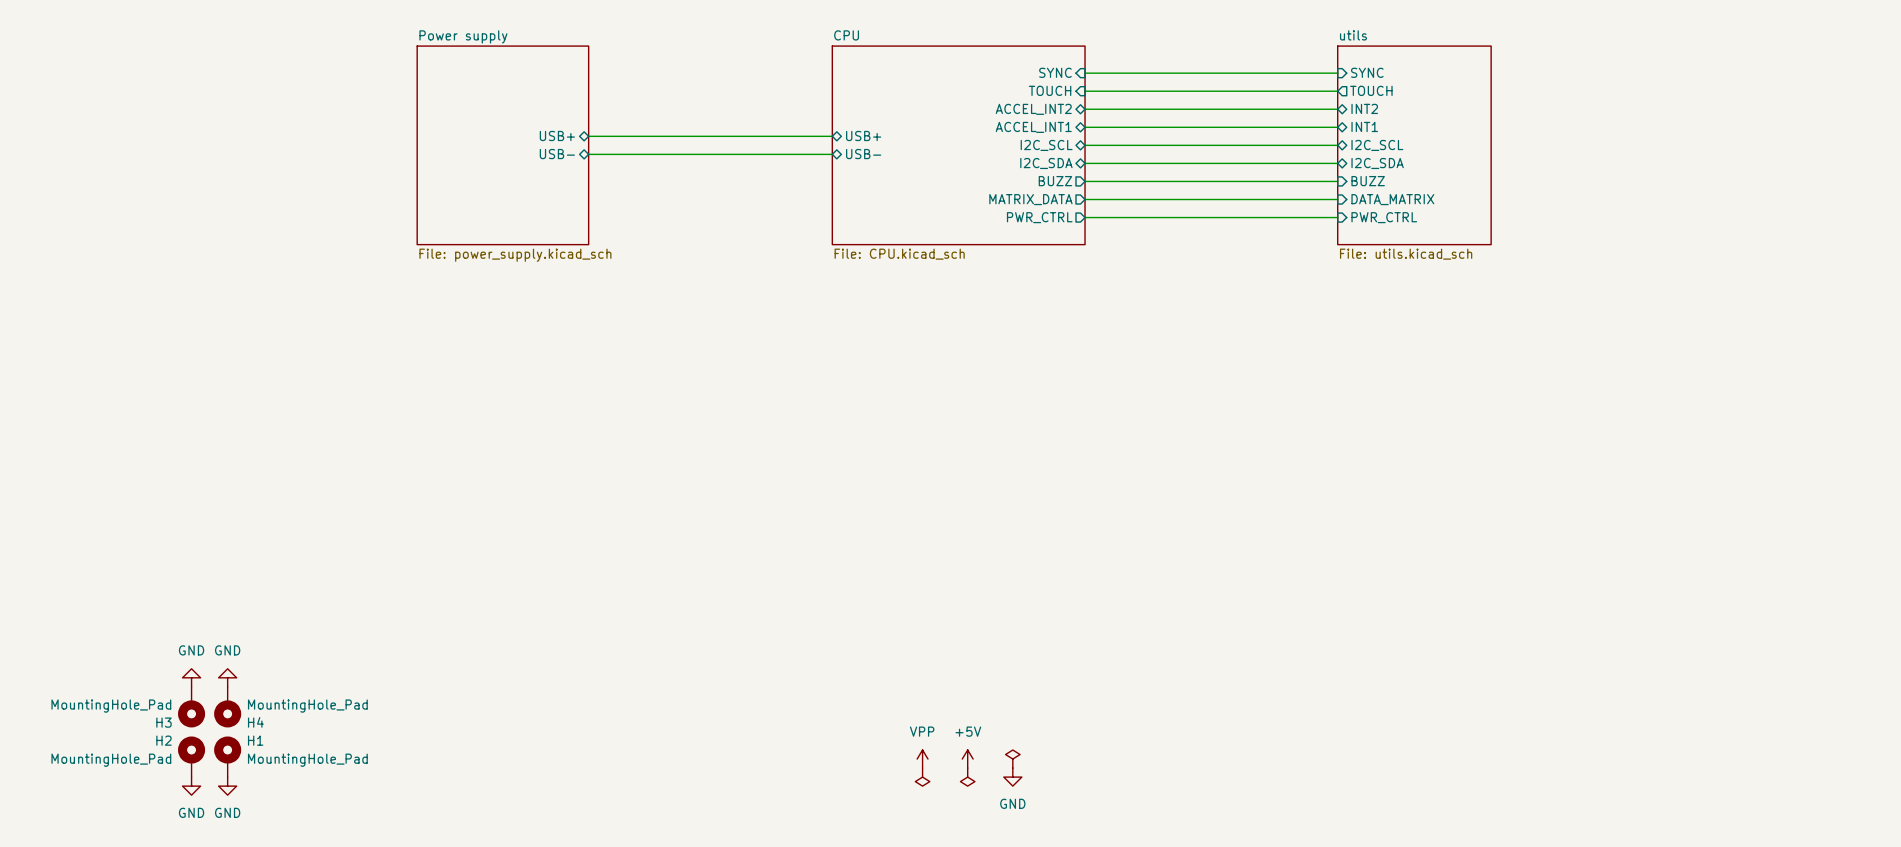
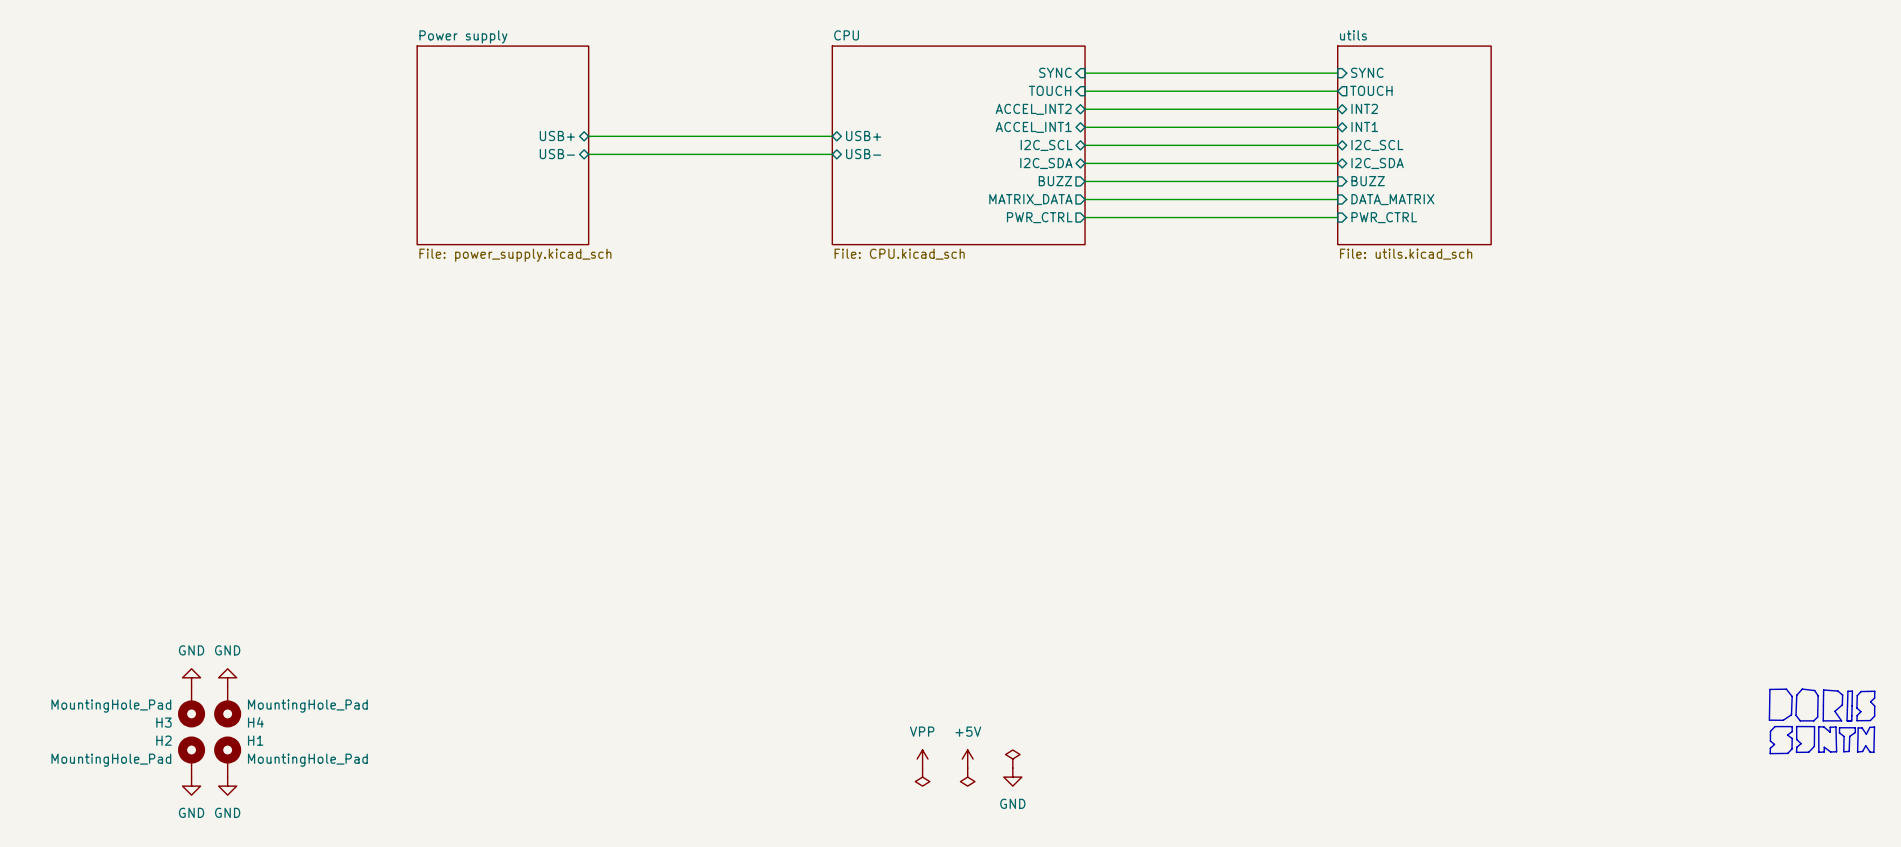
line: none -> (1786, 689) (1769, 689) (1769, 720) (1783, 720) (1791, 714) (1792, 696) (1786, 689)
line: none -> (1802, 689) (1796, 695) (1795, 715) (1800, 720) (1813, 720) (1817, 717) (1818, 695) (1814, 690) (1802, 689)
line: none -> (1823, 690) (1823, 720) (1841, 720) (1834, 711) (1842, 704) (1842, 695) (1837, 691) (1823, 690)
line: none -> (1874, 691) (1861, 691) (1857, 695) (1856, 708) (1860, 711) (1857, 715) (1856, 720) (1870, 720) (1874, 716) (1874, 706) (1870, 701) (1874, 698) (1874, 691)
line: none -> (1851, 720) (1852, 691) (1847, 691) (1847, 720) (1851, 720)
line: none -> (1774, 726) (1770, 731) (1770, 741) (1774, 744) (1770, 748) (1770, 753) (1787, 753) (1792, 748) (1792, 738) (1787, 735) (1792, 731) (1792, 726) (1774, 726)
line: none -> (1796, 726) (1796, 739) (1801, 743) (1796, 747) (1796, 752) (1808, 752) (1814, 746) (1814, 726) (1796, 726)
line: none -> (1818, 726) (1818, 752) (1824, 751) (1824, 747) (1830, 751) (1836, 751) (1835, 727) (1830, 727) (1830, 732) (1823, 726) (1818, 726)
line: none -> (1839, 727) (1839, 732) (1844, 736) (1843, 751) (1849, 751) (1849, 736) (1855, 732) (1855, 727) (1839, 727)
line: none -> (1874, 727) (1869, 727) (1866, 734) (1862, 727) (1858, 727) (1857, 752) (1862, 751) (1865, 745) (1870, 752) (1873, 752) (1874, 727)

